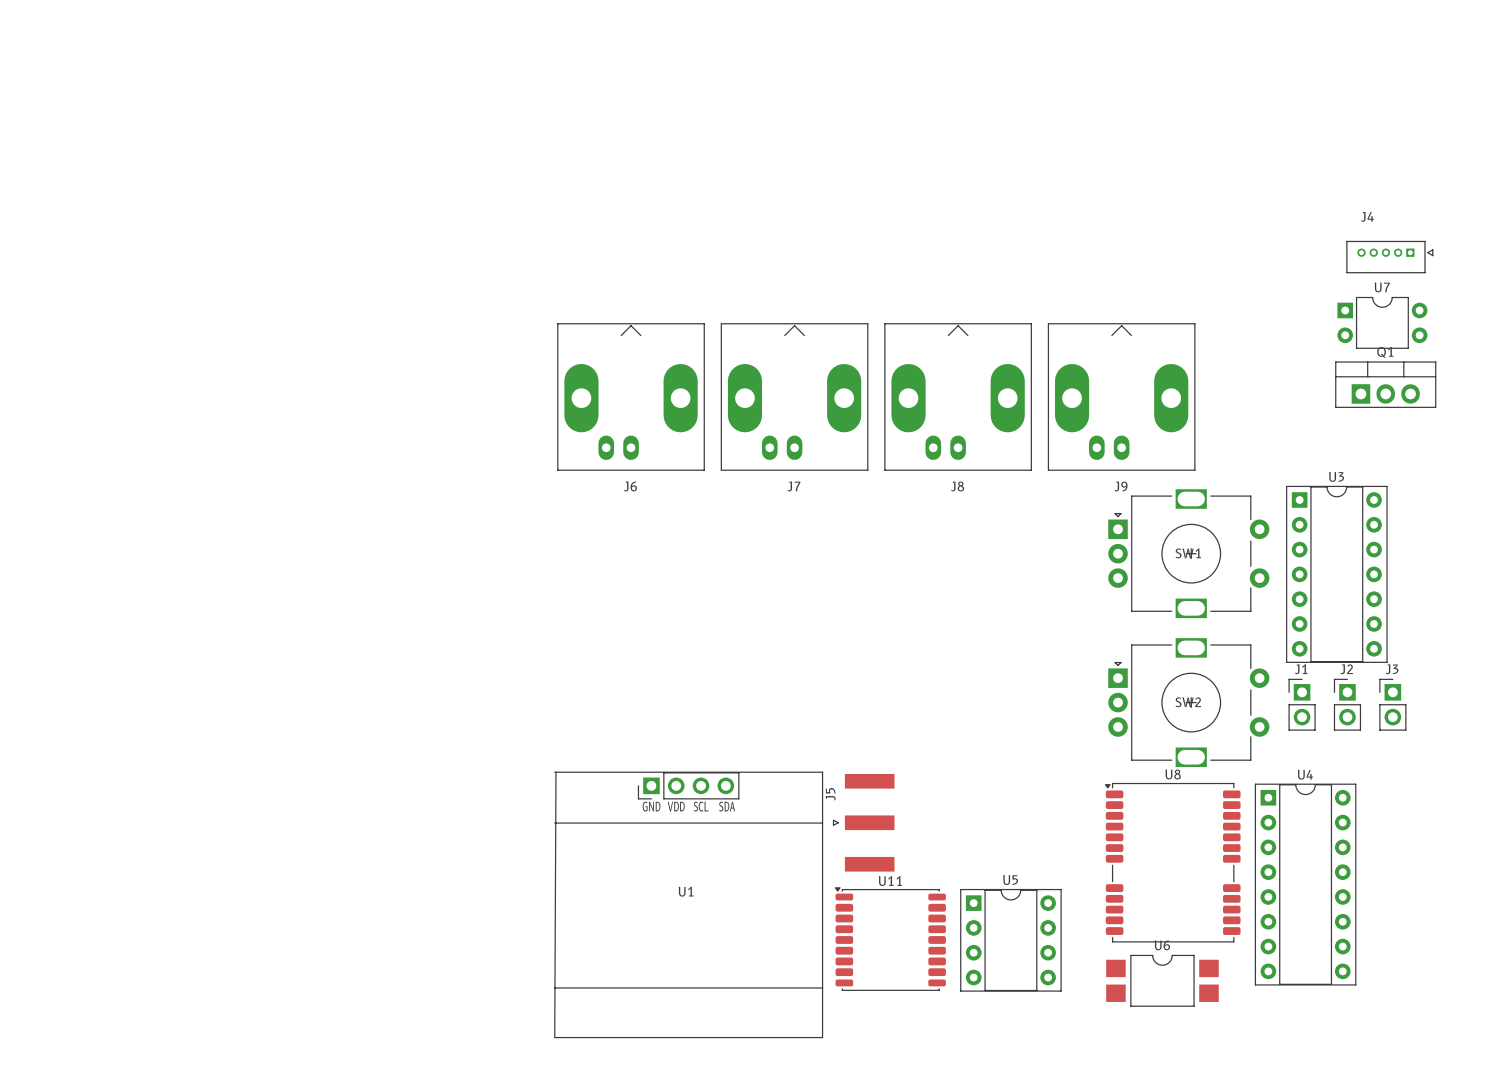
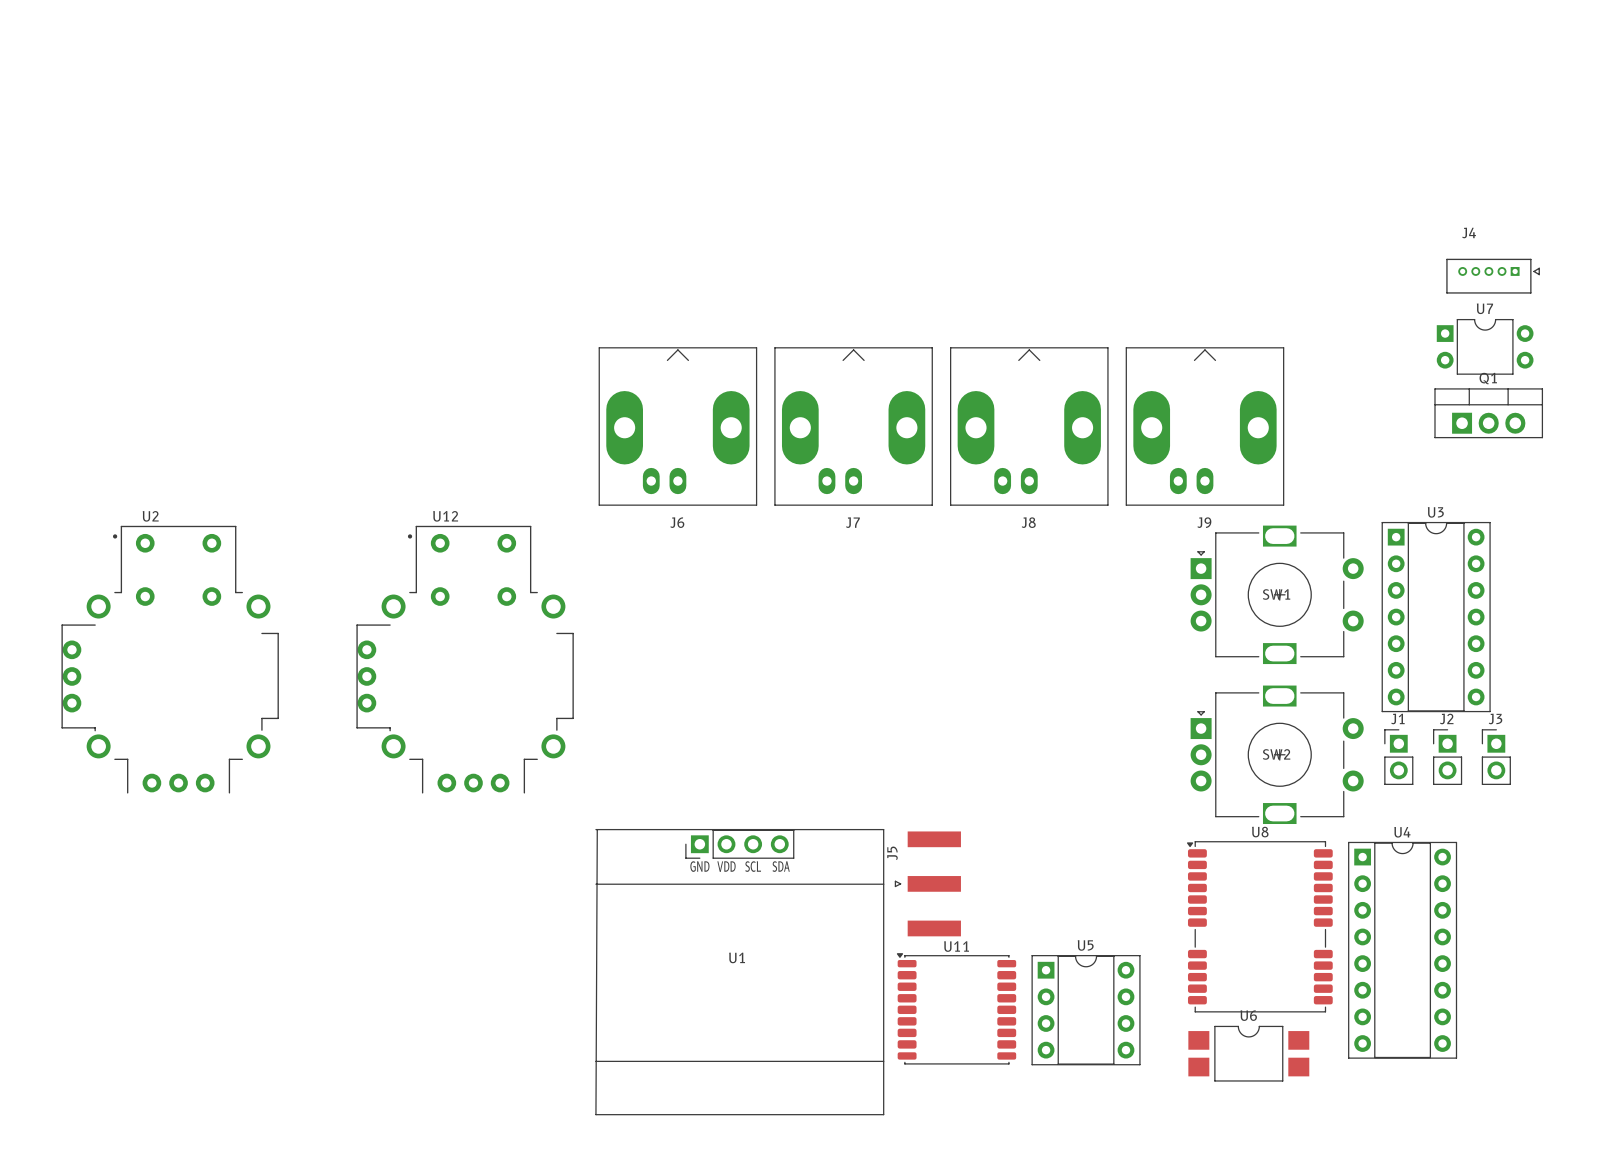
U2: none -> (170, 659)
U12: none -> (465, 659)

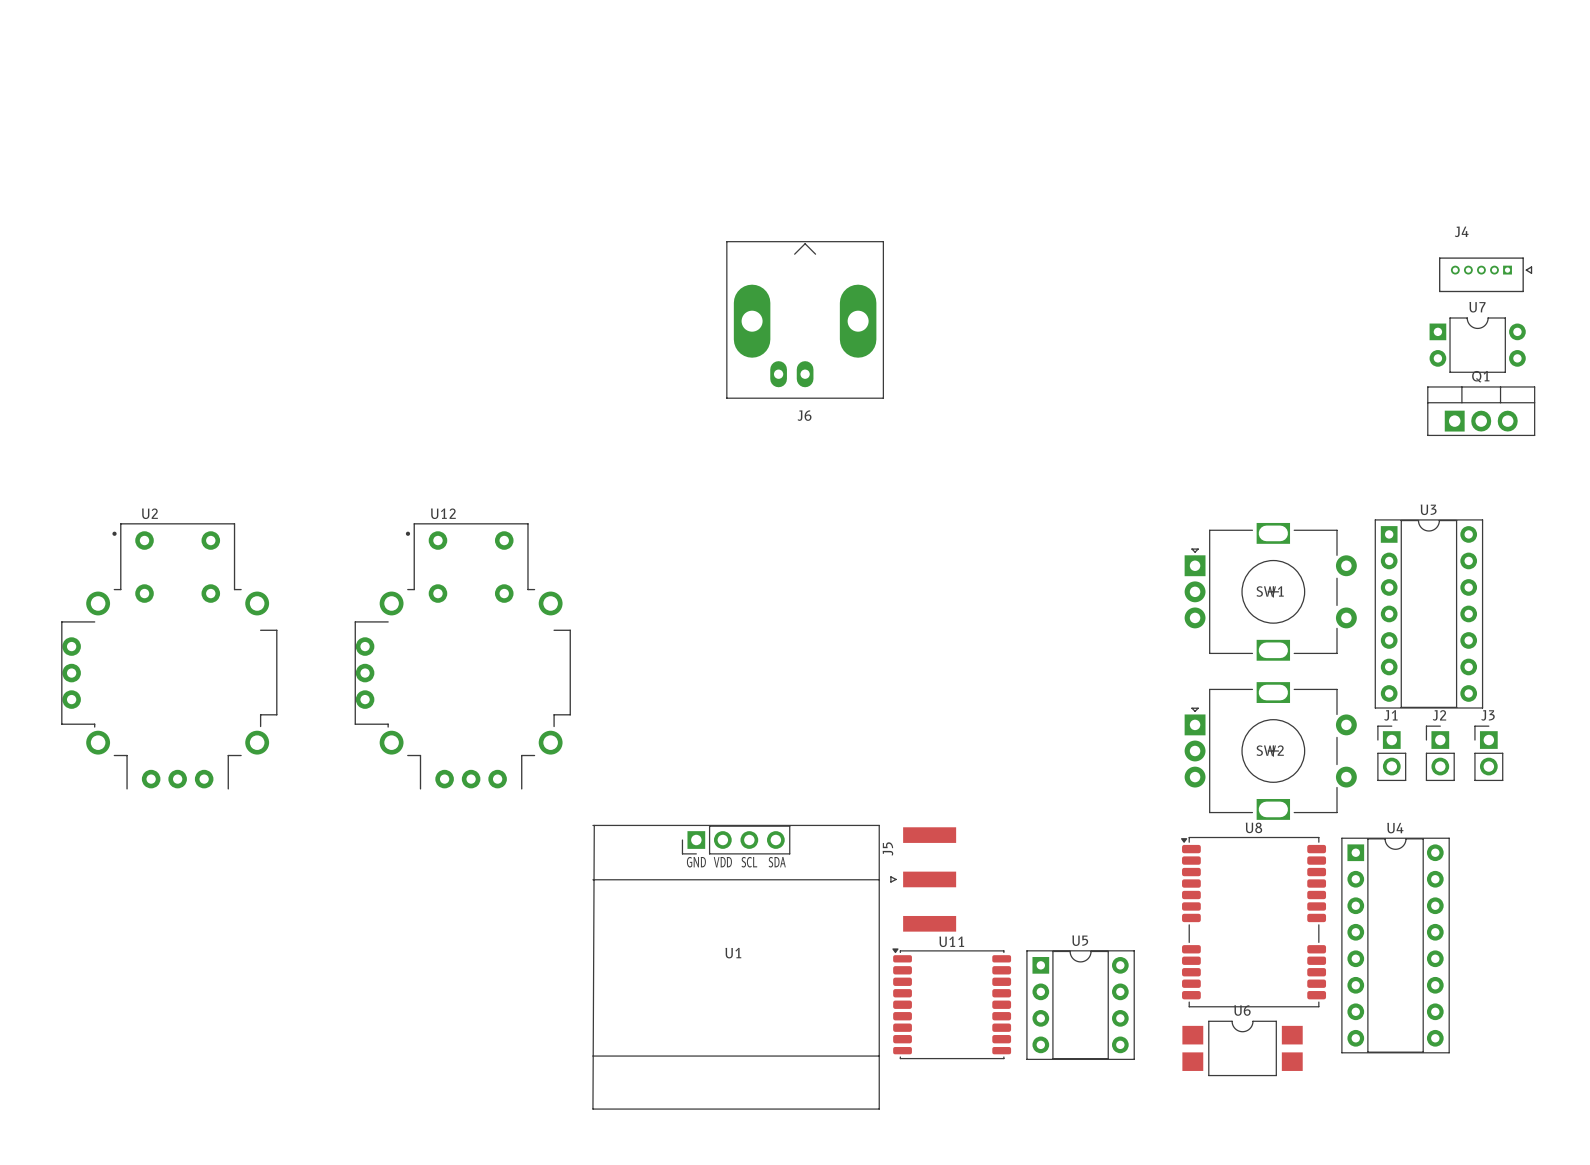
J6 position: (677, 426) -> (805, 319)
J7: (853, 426) -> none
J8: (1029, 426) -> none
J9: (1204, 426) -> none

